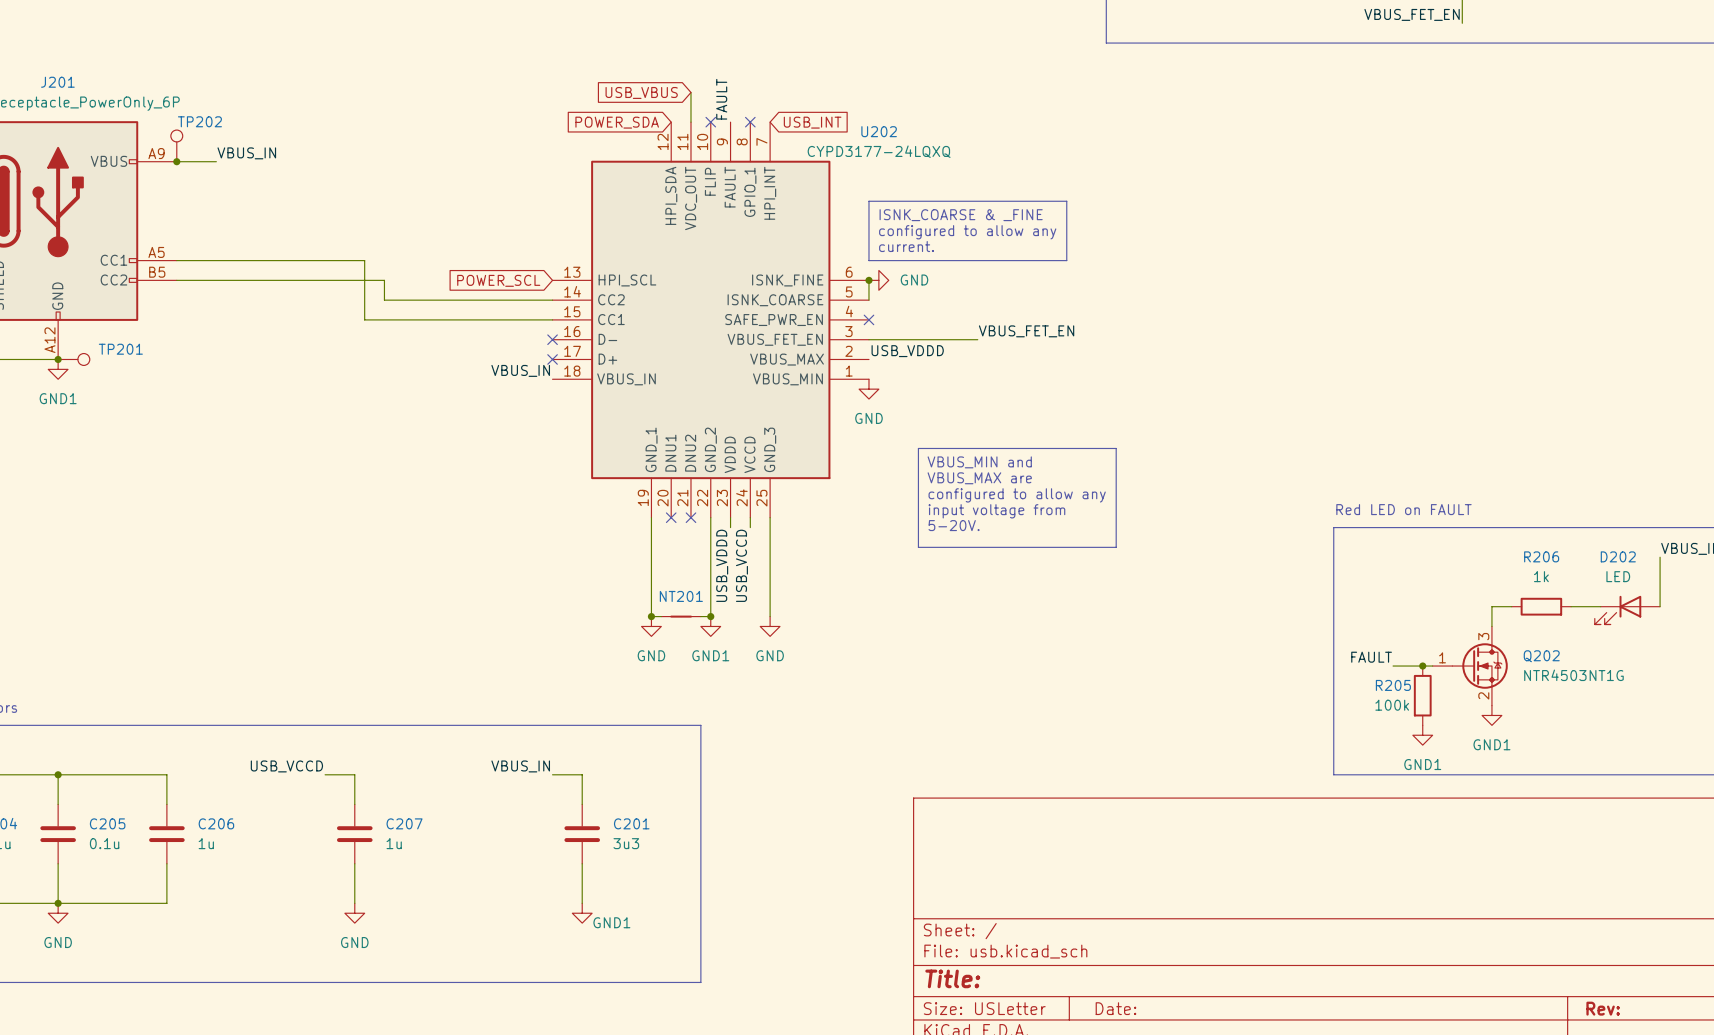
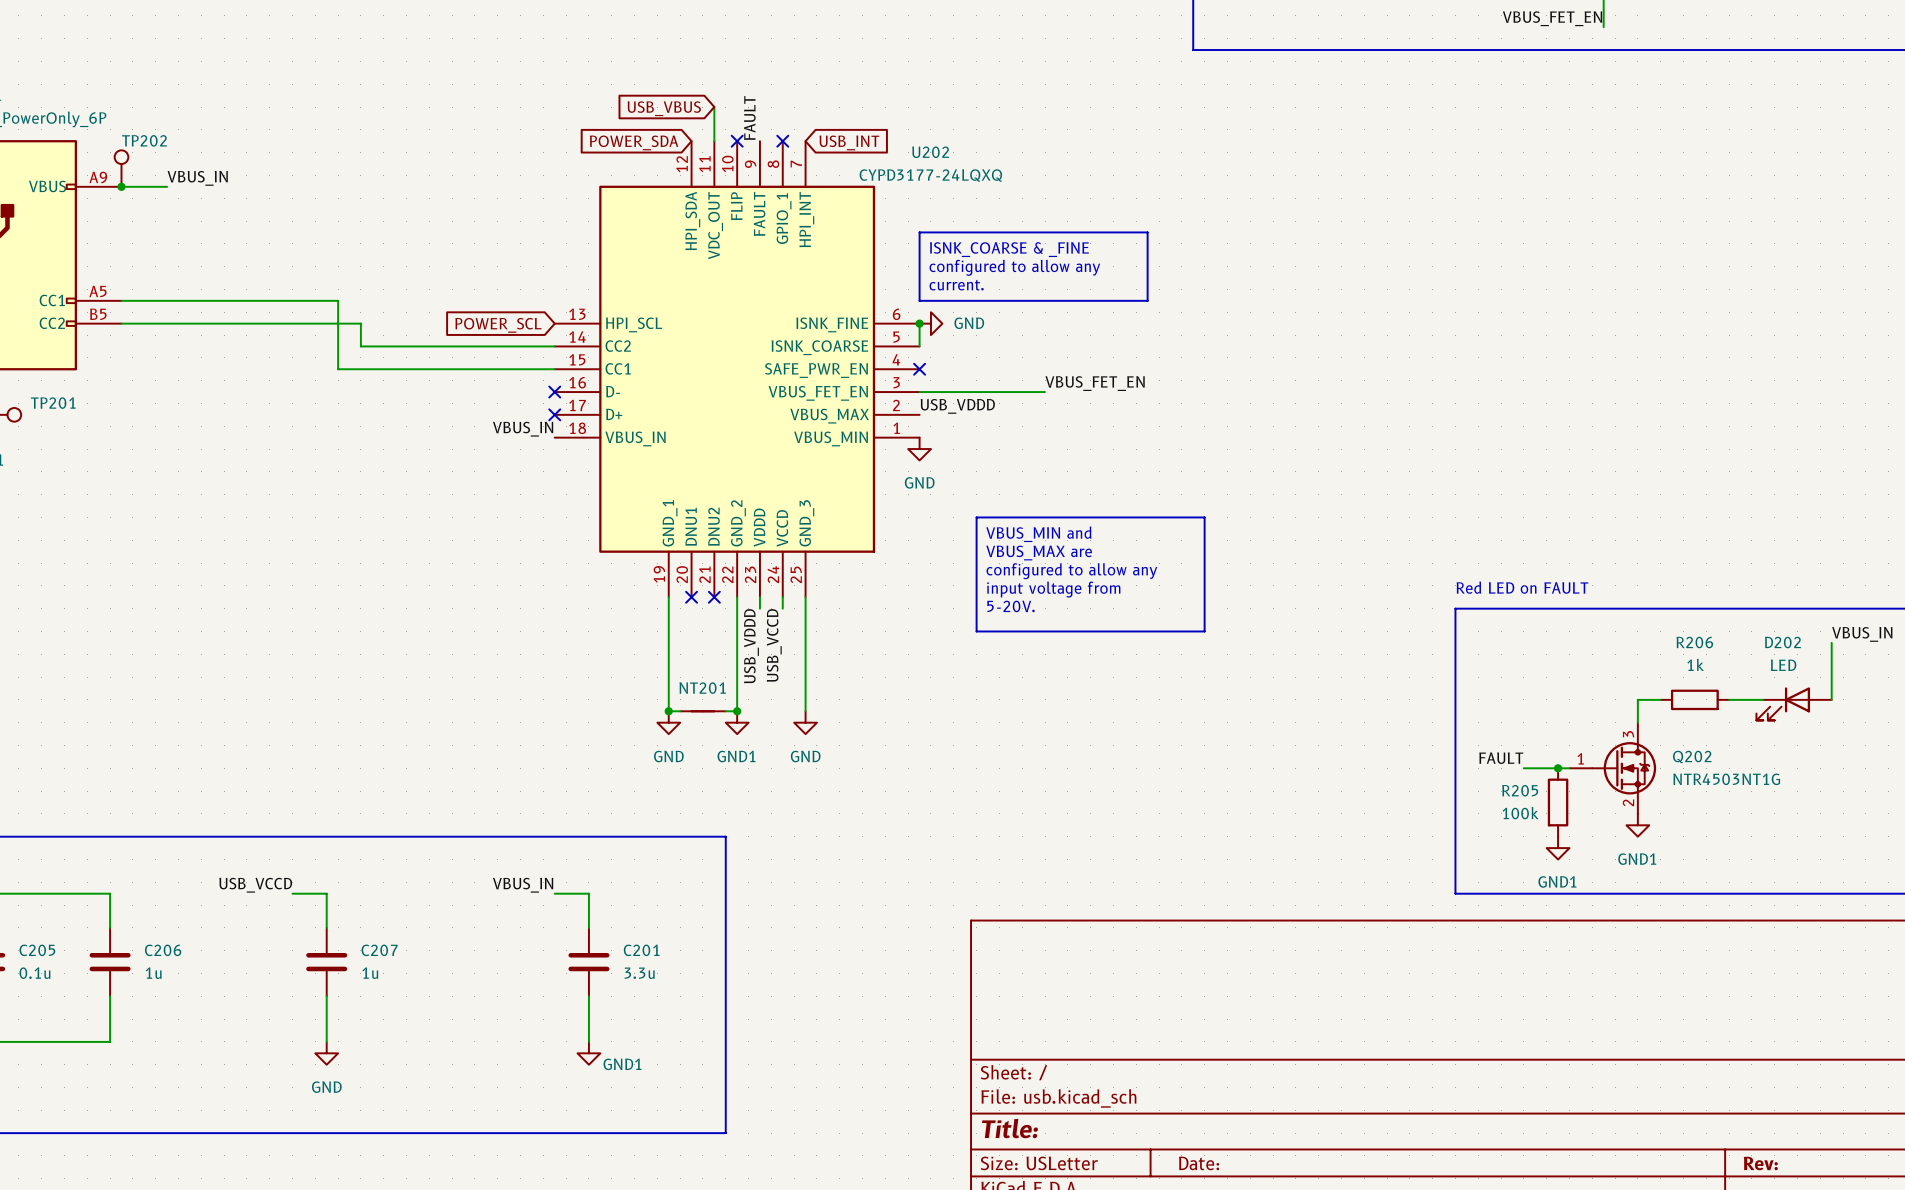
C201 value: 3u3 (626, 843) -> 3.3u (639, 973)

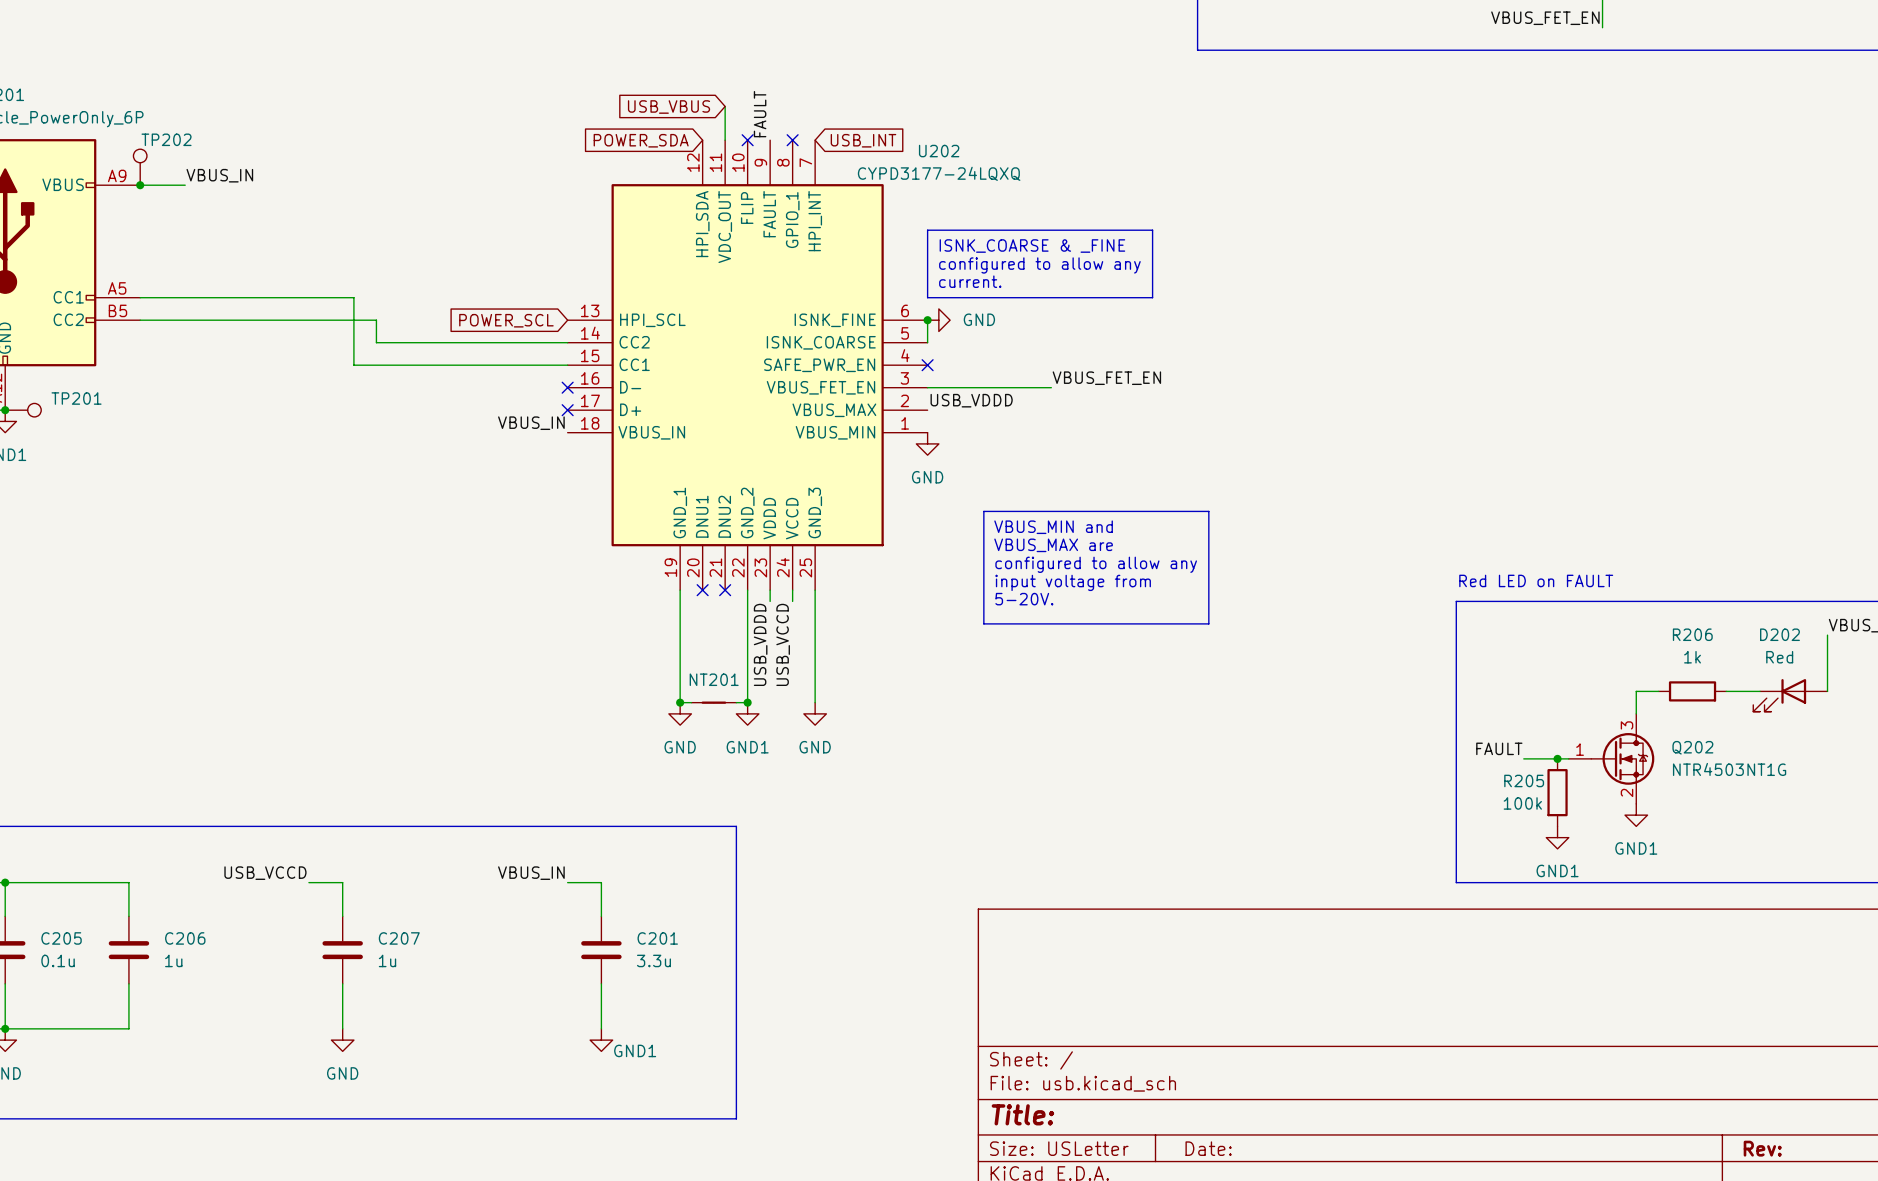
D202 value: LED (1783, 665) -> Red (1779, 657)

